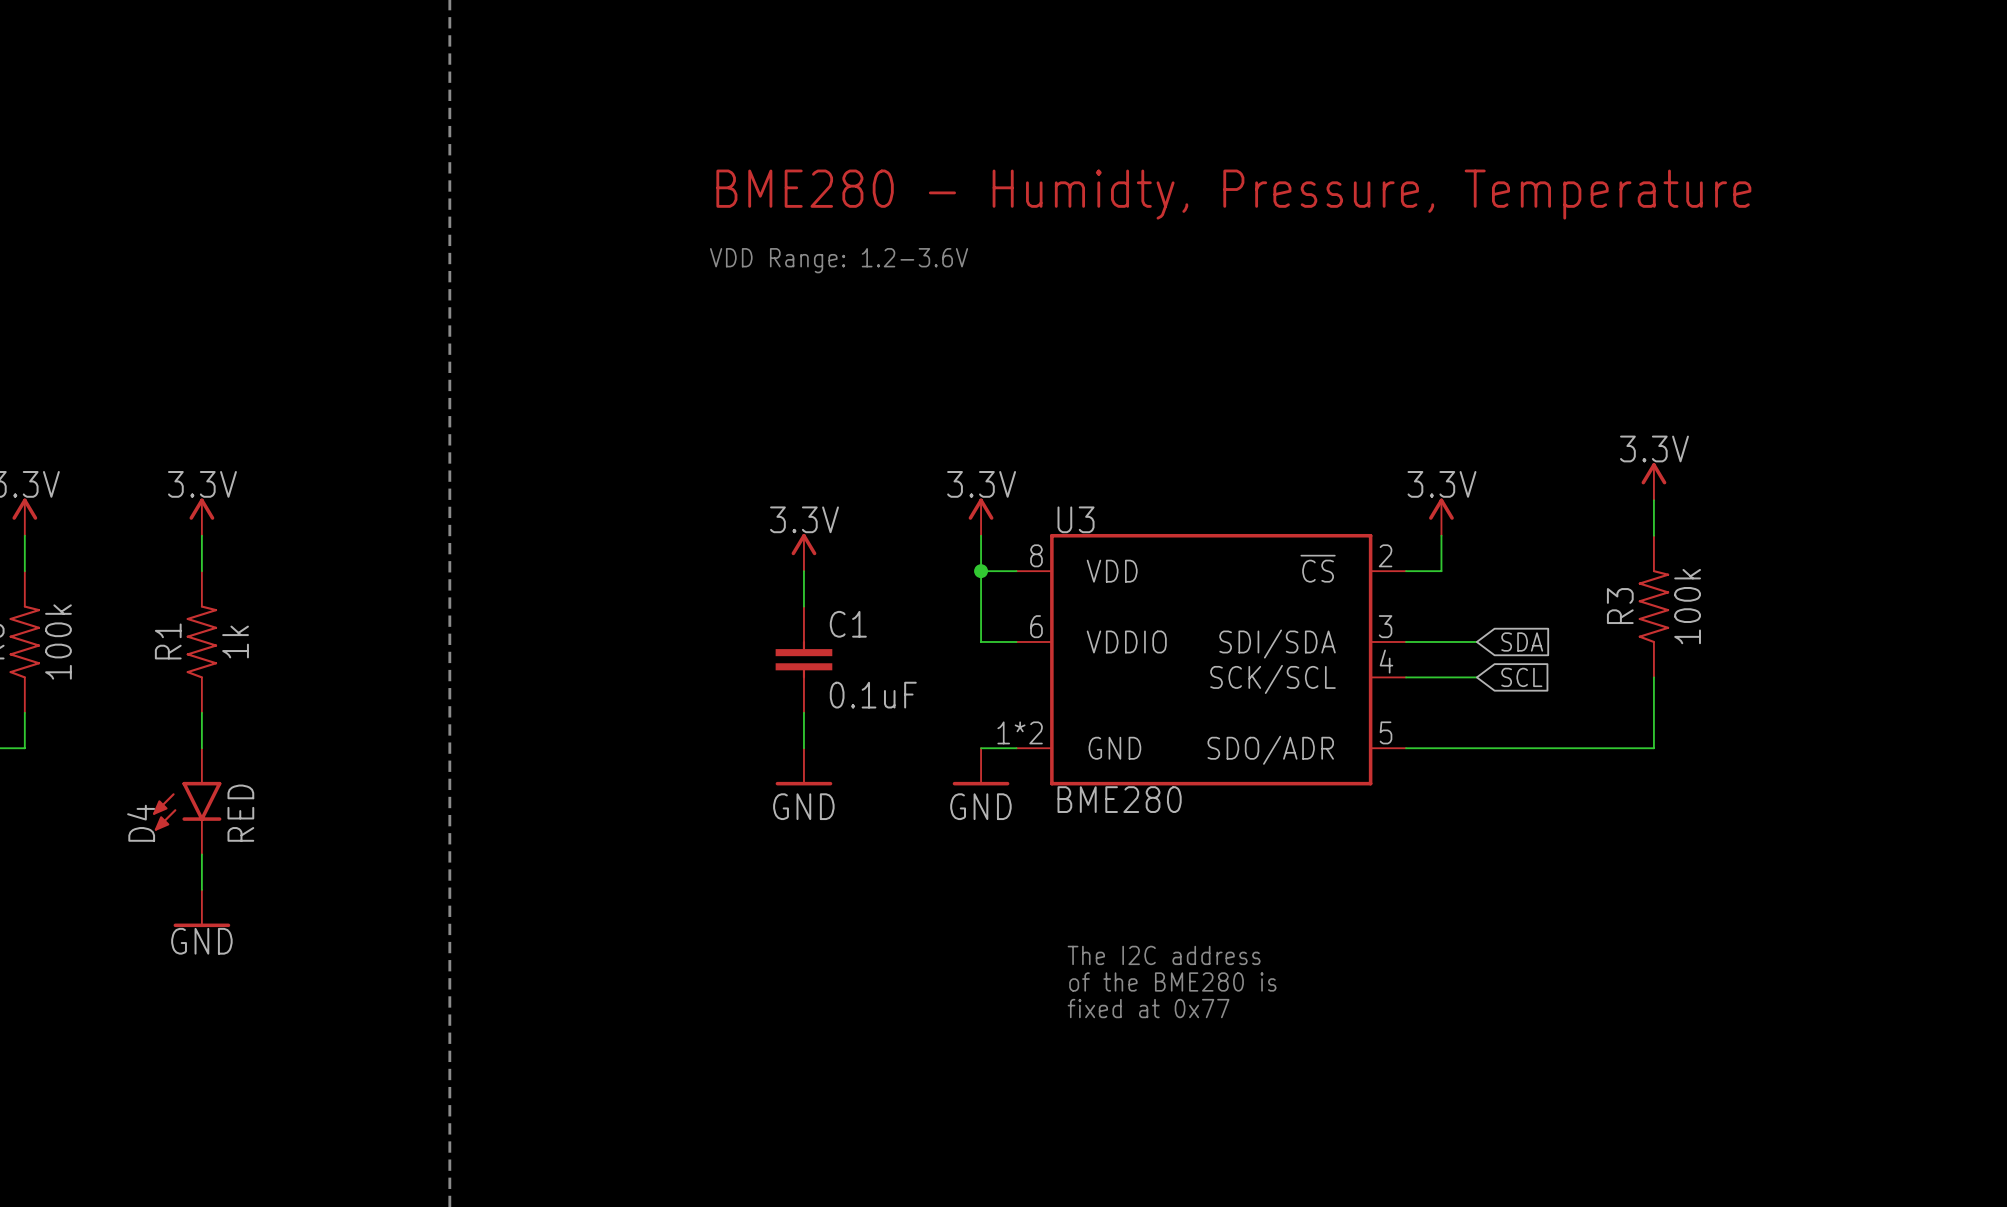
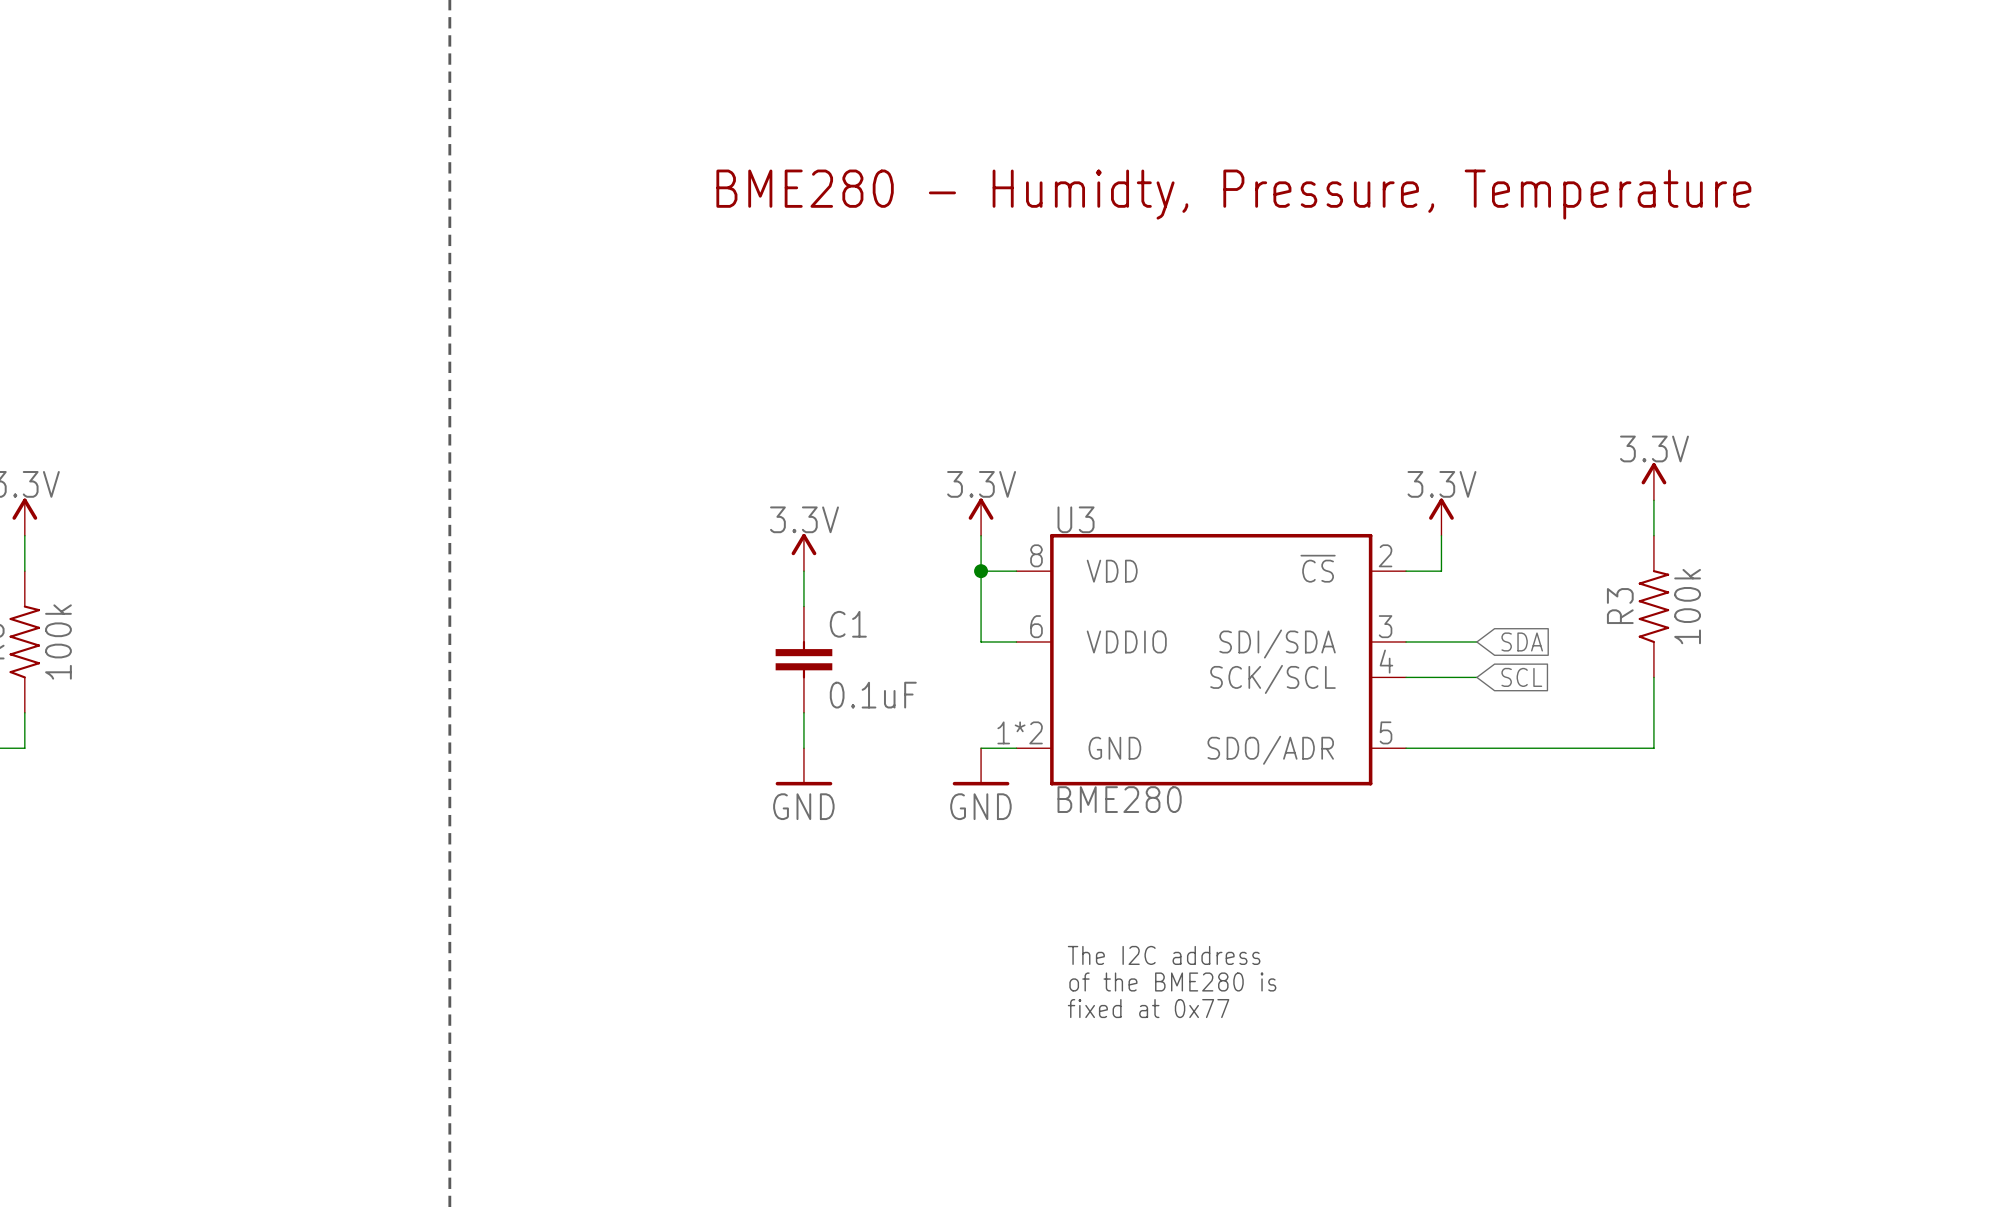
text: VDD Range: 1.2-3.6V (839, 260) -> none
power symbol: 3.3V (201, 517) -> none
wire: (201, 535) (201, 571) -> none
R1: 1k (201, 641) -> none
wire: (201, 712) (201, 748) -> none
D4: RED (187, 801) -> none
wire: (201, 854) (201, 889) -> none
power symbol: GND (201, 908) -> none

